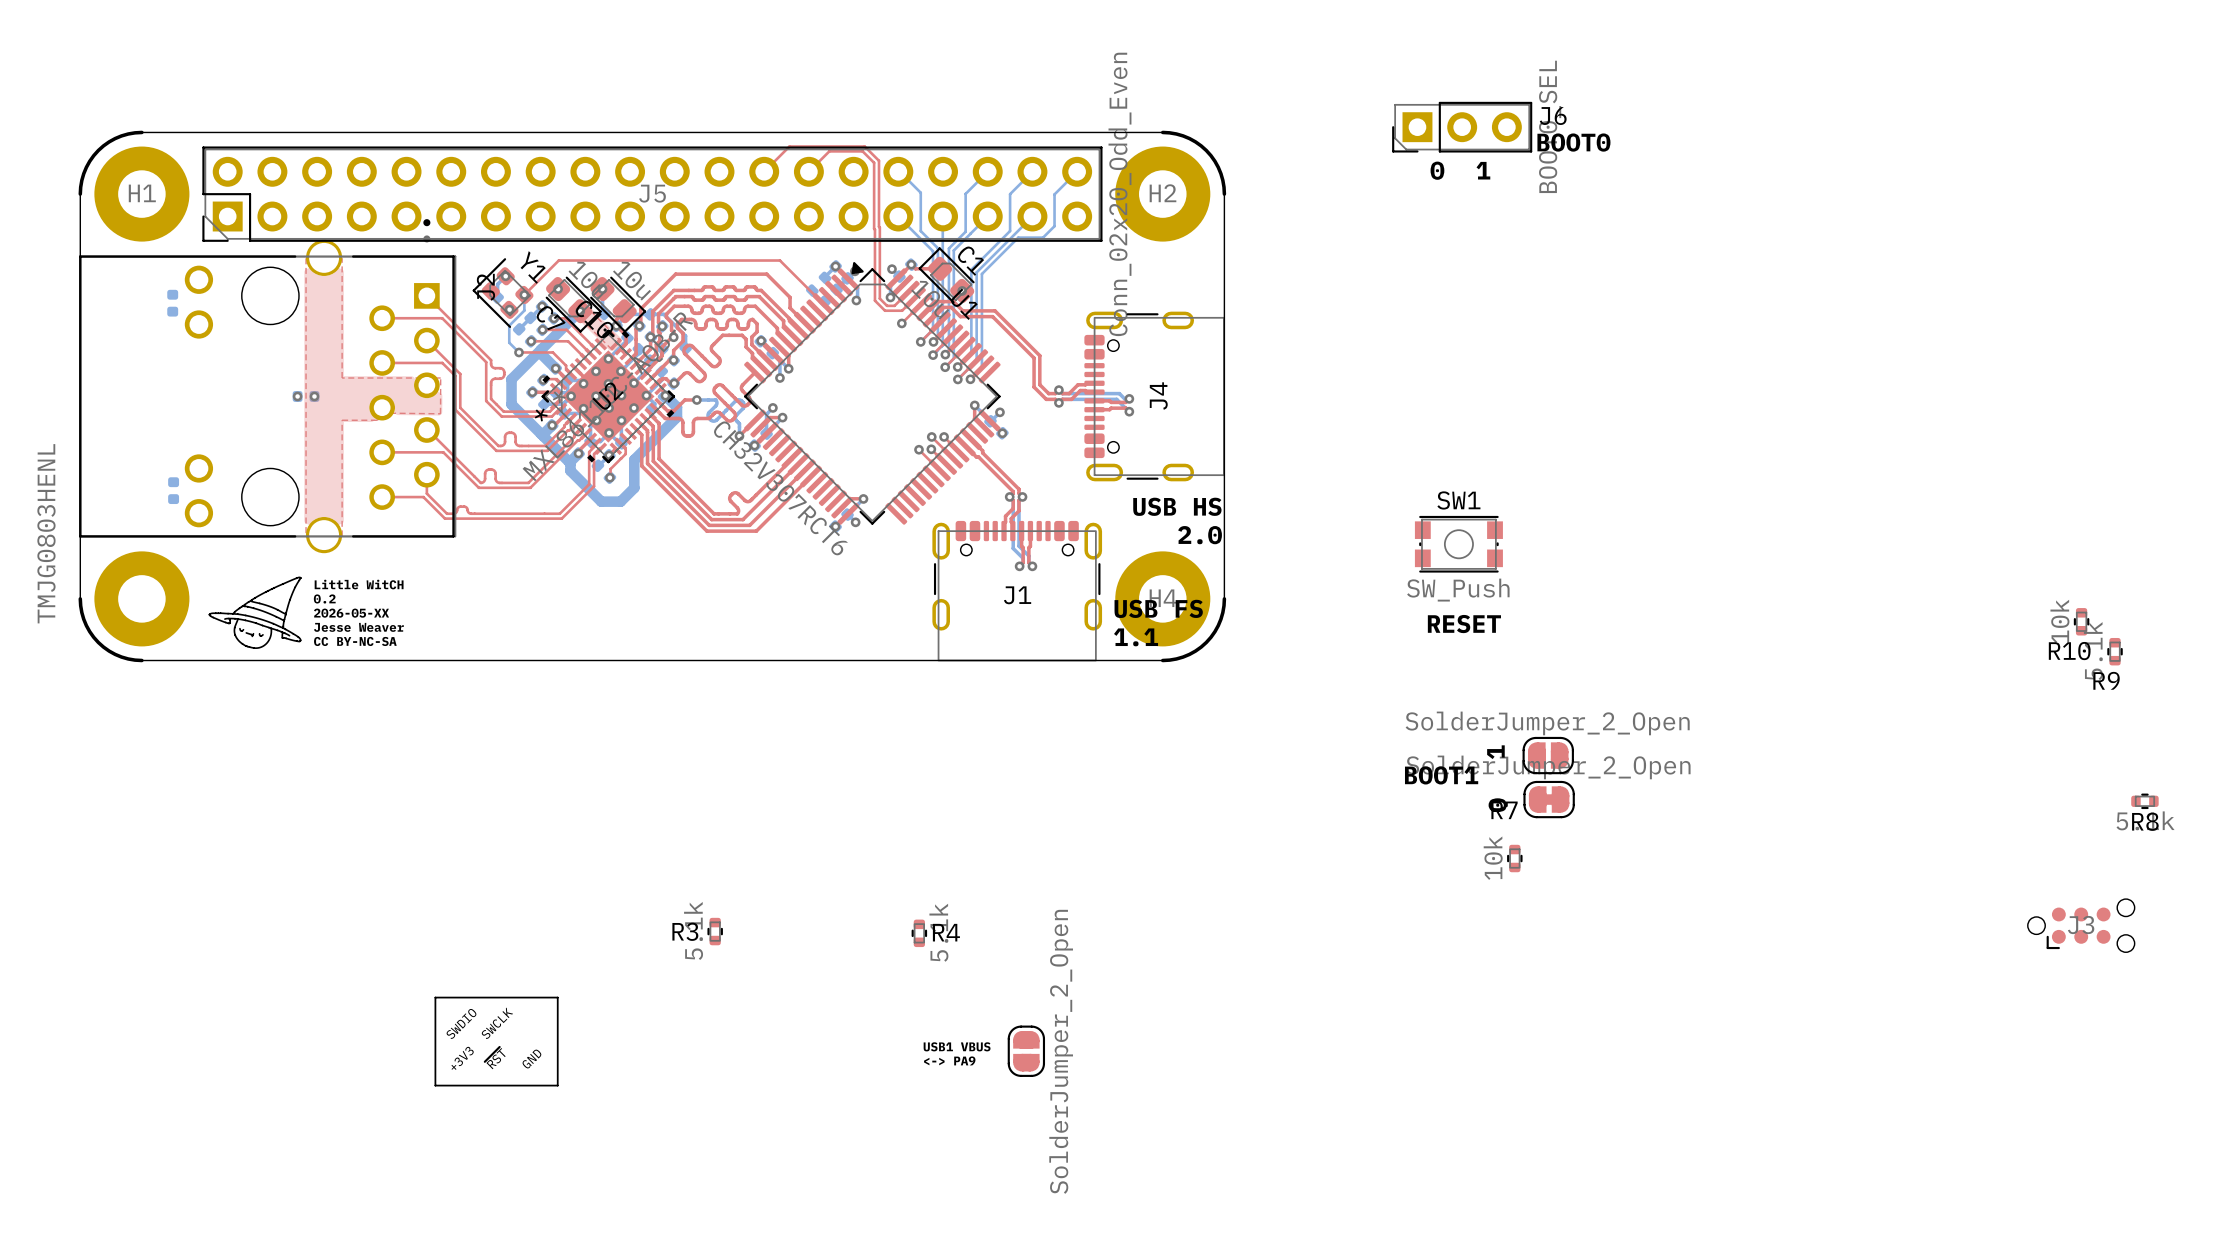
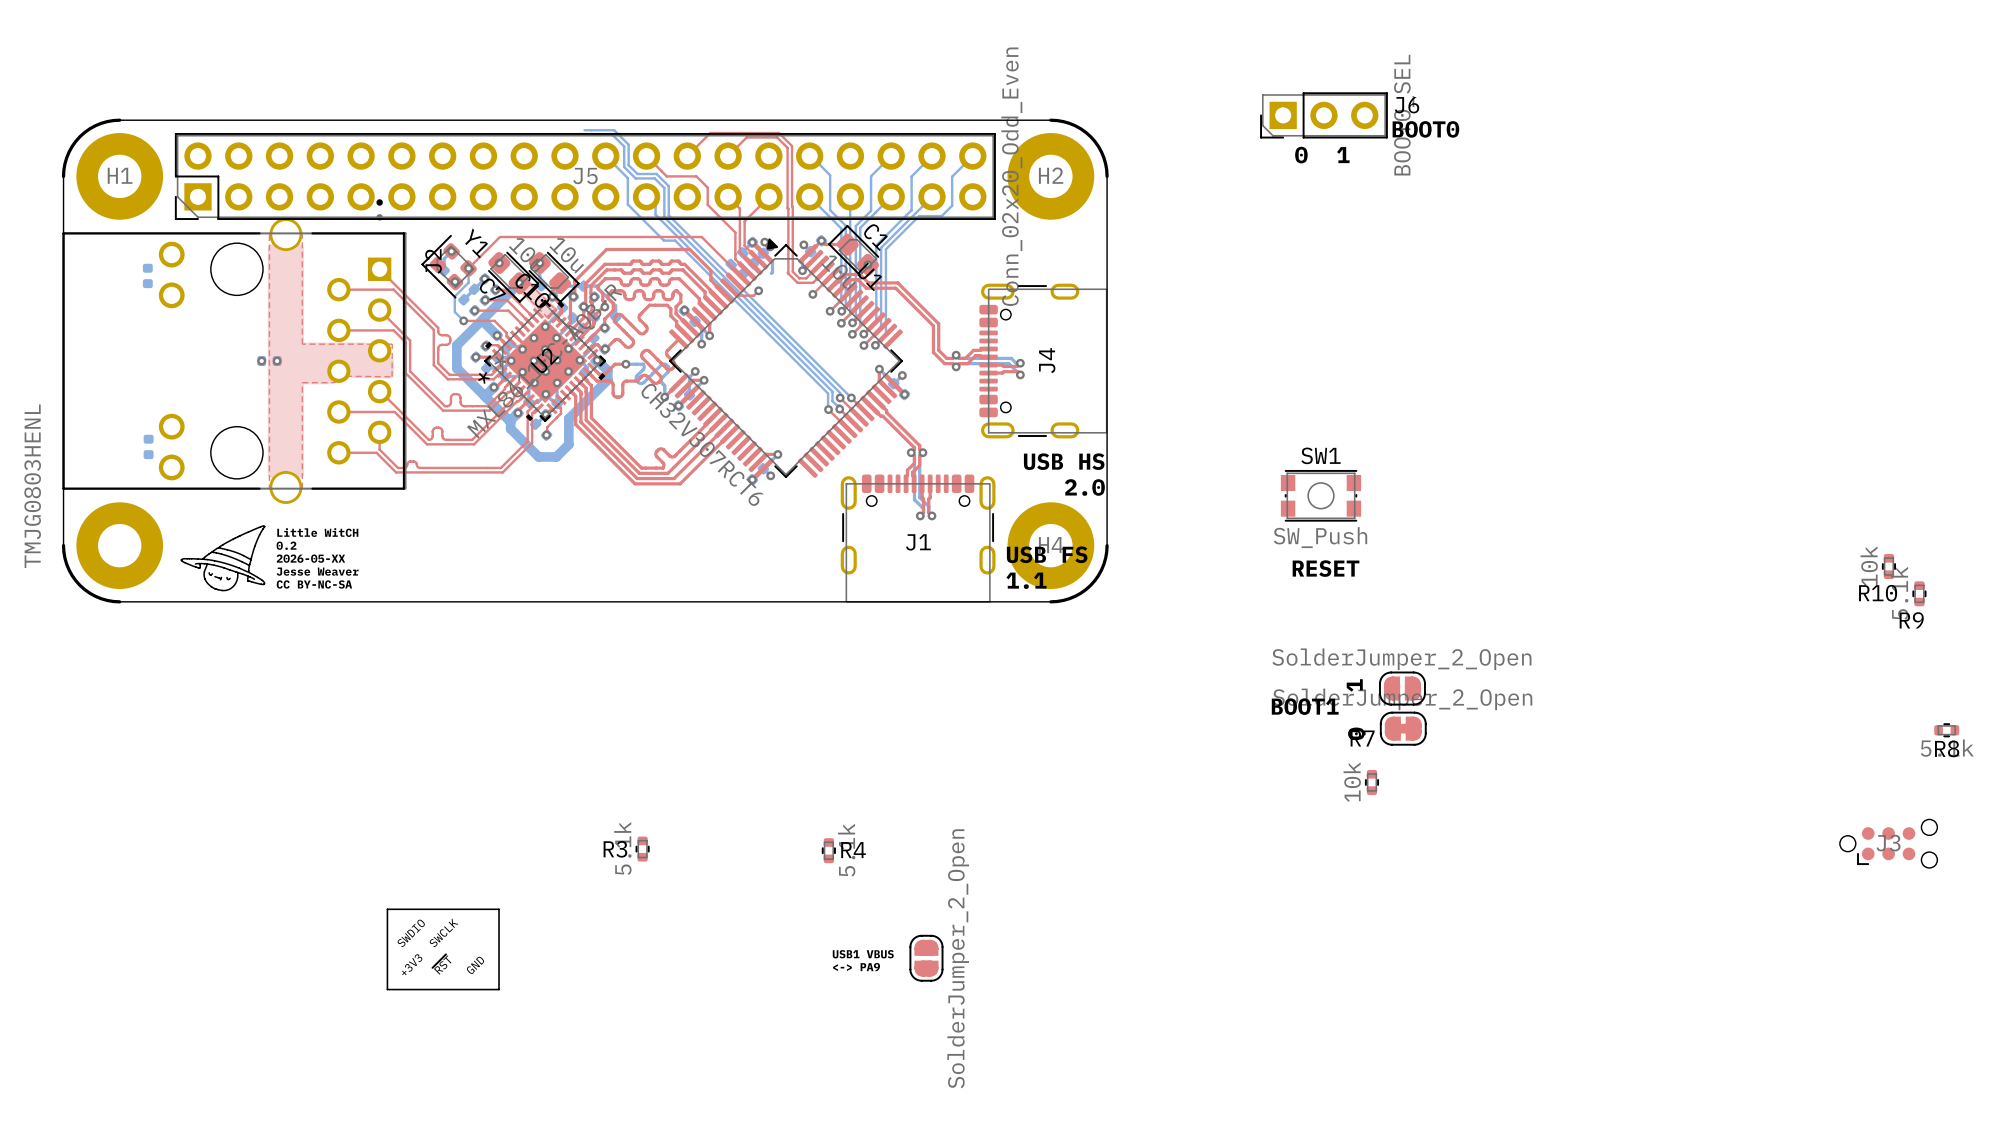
bottom track: none -> (584, 130) (614, 130) (628, 144) (628, 165) (637, 173) (656, 173) (668, 186) (668, 215) (851, 397)
bottom track: none -> (593, 134) (612, 134) (624, 146) (624, 167) (635, 178) (654, 178) (664, 188) (664, 217) (840, 393) (840, 397)
bottom track: none -> (605, 156) (627, 178) (627, 204) (663, 240) (675, 240) (828, 393) (828, 409)
top track: none -> (646, 156) (666, 176) (696, 176) (707, 187) (707, 204) (735, 232) (735, 259) (747, 271)
bottom track: none -> (646, 196) (655, 205) (655, 214) (832, 391) (832, 401) (839, 405) (839, 409)
top track: none -> (728, 196) (739, 208) (739, 252) (752, 265)
top track: none -> (768, 197) (744, 221) (744, 245) (758, 259)
via: none -> (764, 242)
via: (856, 300) -> none
top track: none -> (730, 288) (737, 295) (753, 295) (758, 290)
via: none -> (758, 290)

